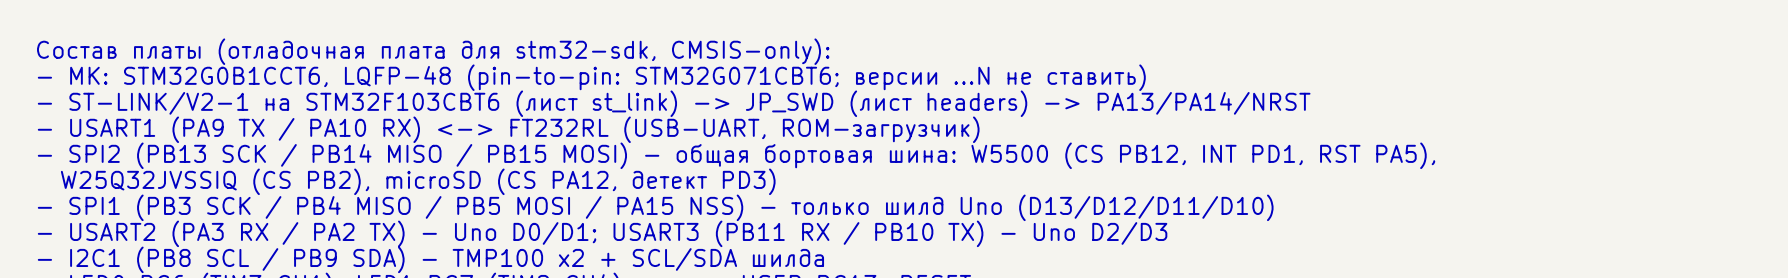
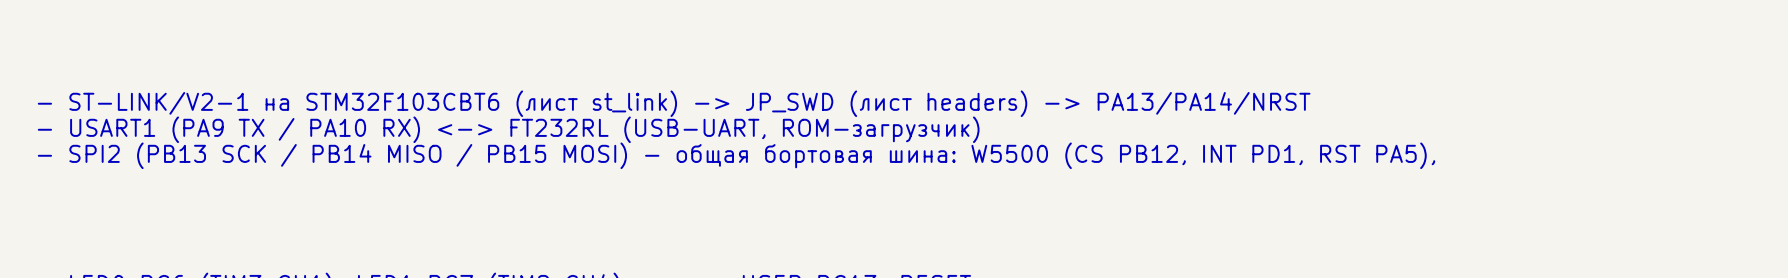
text: Состав платы (отладочная плата для stm32-sdk, CMSIS-only): (433, 51) -> none
text: - МК: STM32G0B1CCT6, LQFP-48 (pin-to-pin: STM32G071CBT6; версии ...N не ставить) (591, 77) -> none
text: W25Q32JVSSIQ (CS PB2), microSD (CS PA12, детект PD3) (418, 181) -> none
text: - SPI1 (PB3 SCK / PB4 MISO / PB5 MOSI / PA15 NSS) - только шилд Uno (D13/D12/D11/D10) (655, 207) -> none
text: - USART2 (PA3 RX / PA2 TX) - Uno D0/D1; USART3 (PB11 RX / PB10 TX) - Uno D2/D3 (602, 233) -> none
text: - I2C1 (PB8 SCL / PB9 SDA) - TMP100 x2 + SCL/SDA шилда (430, 259) -> none

